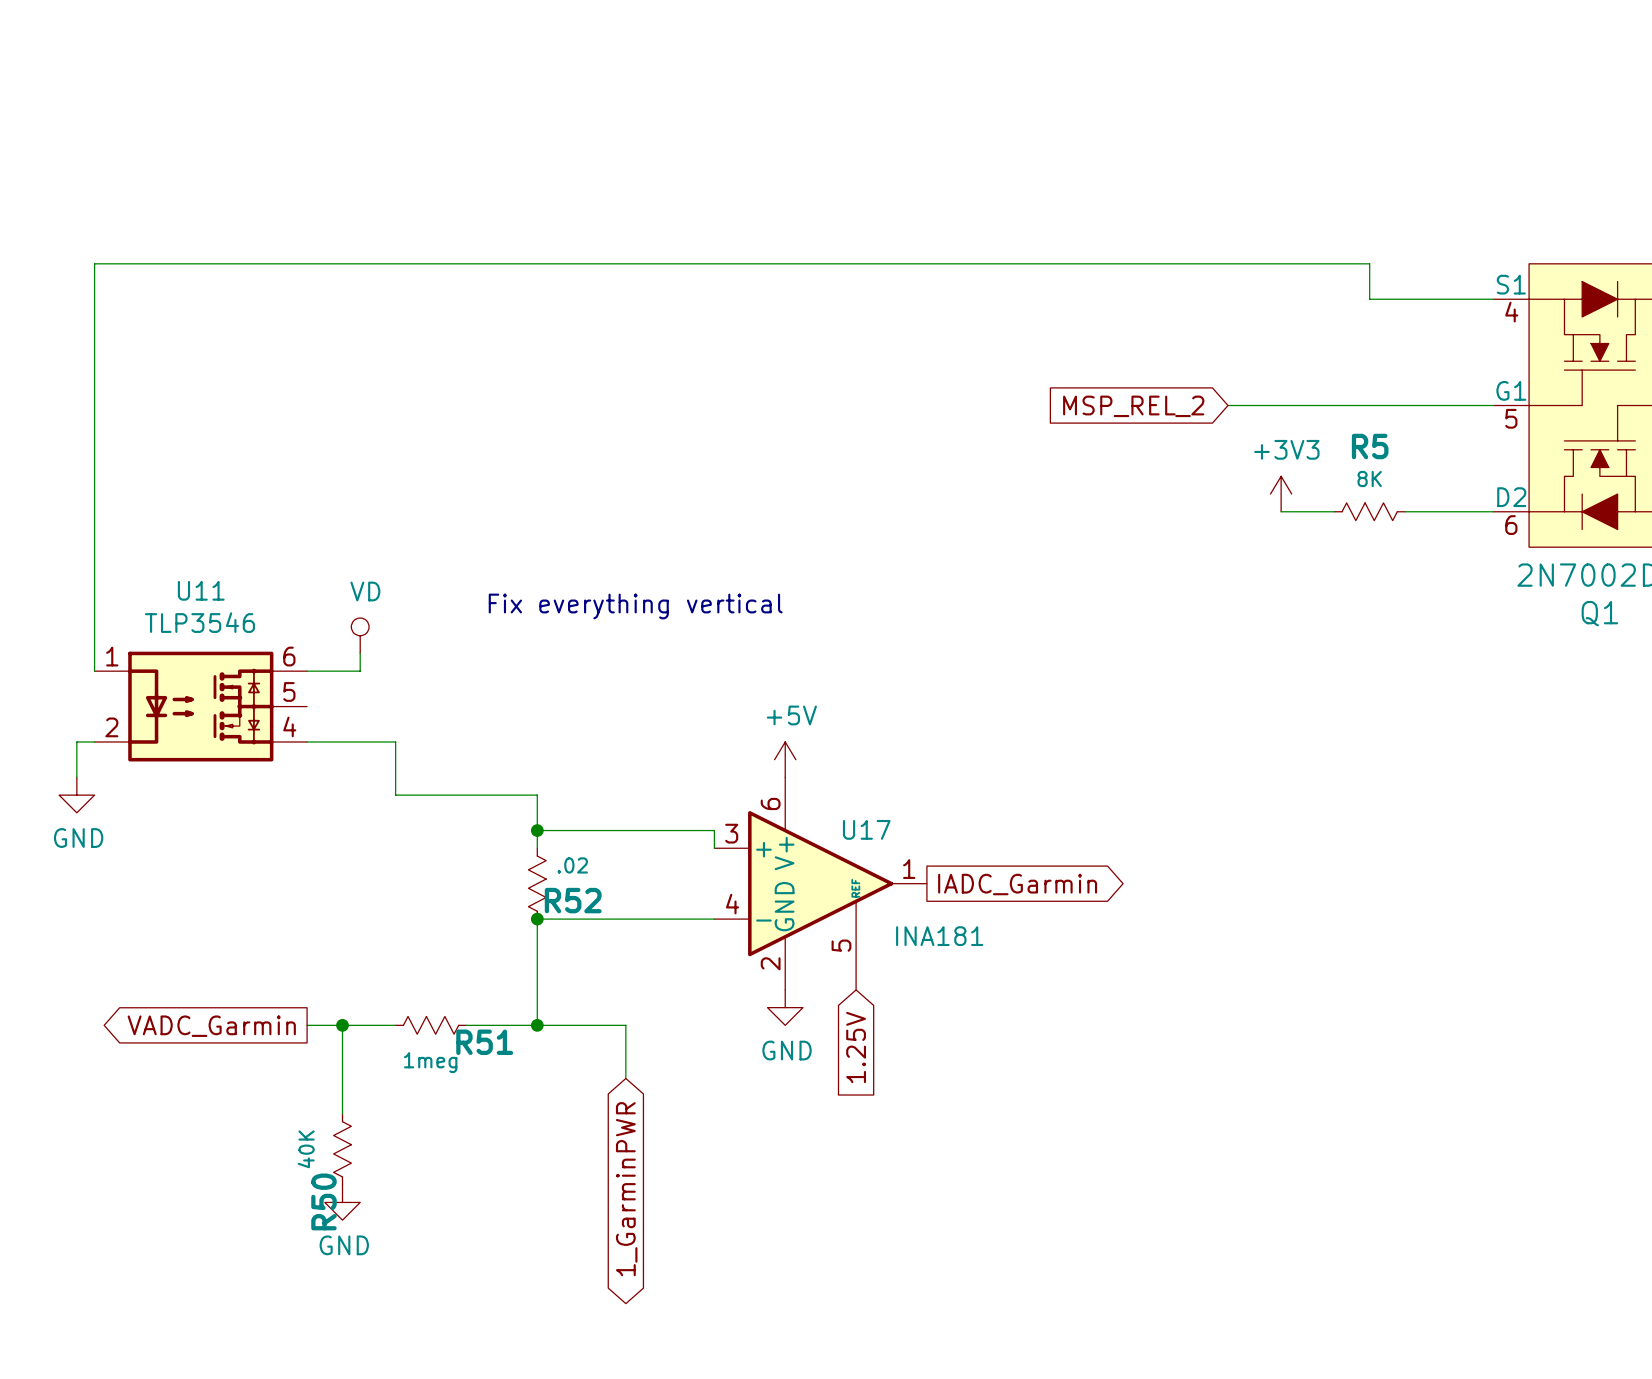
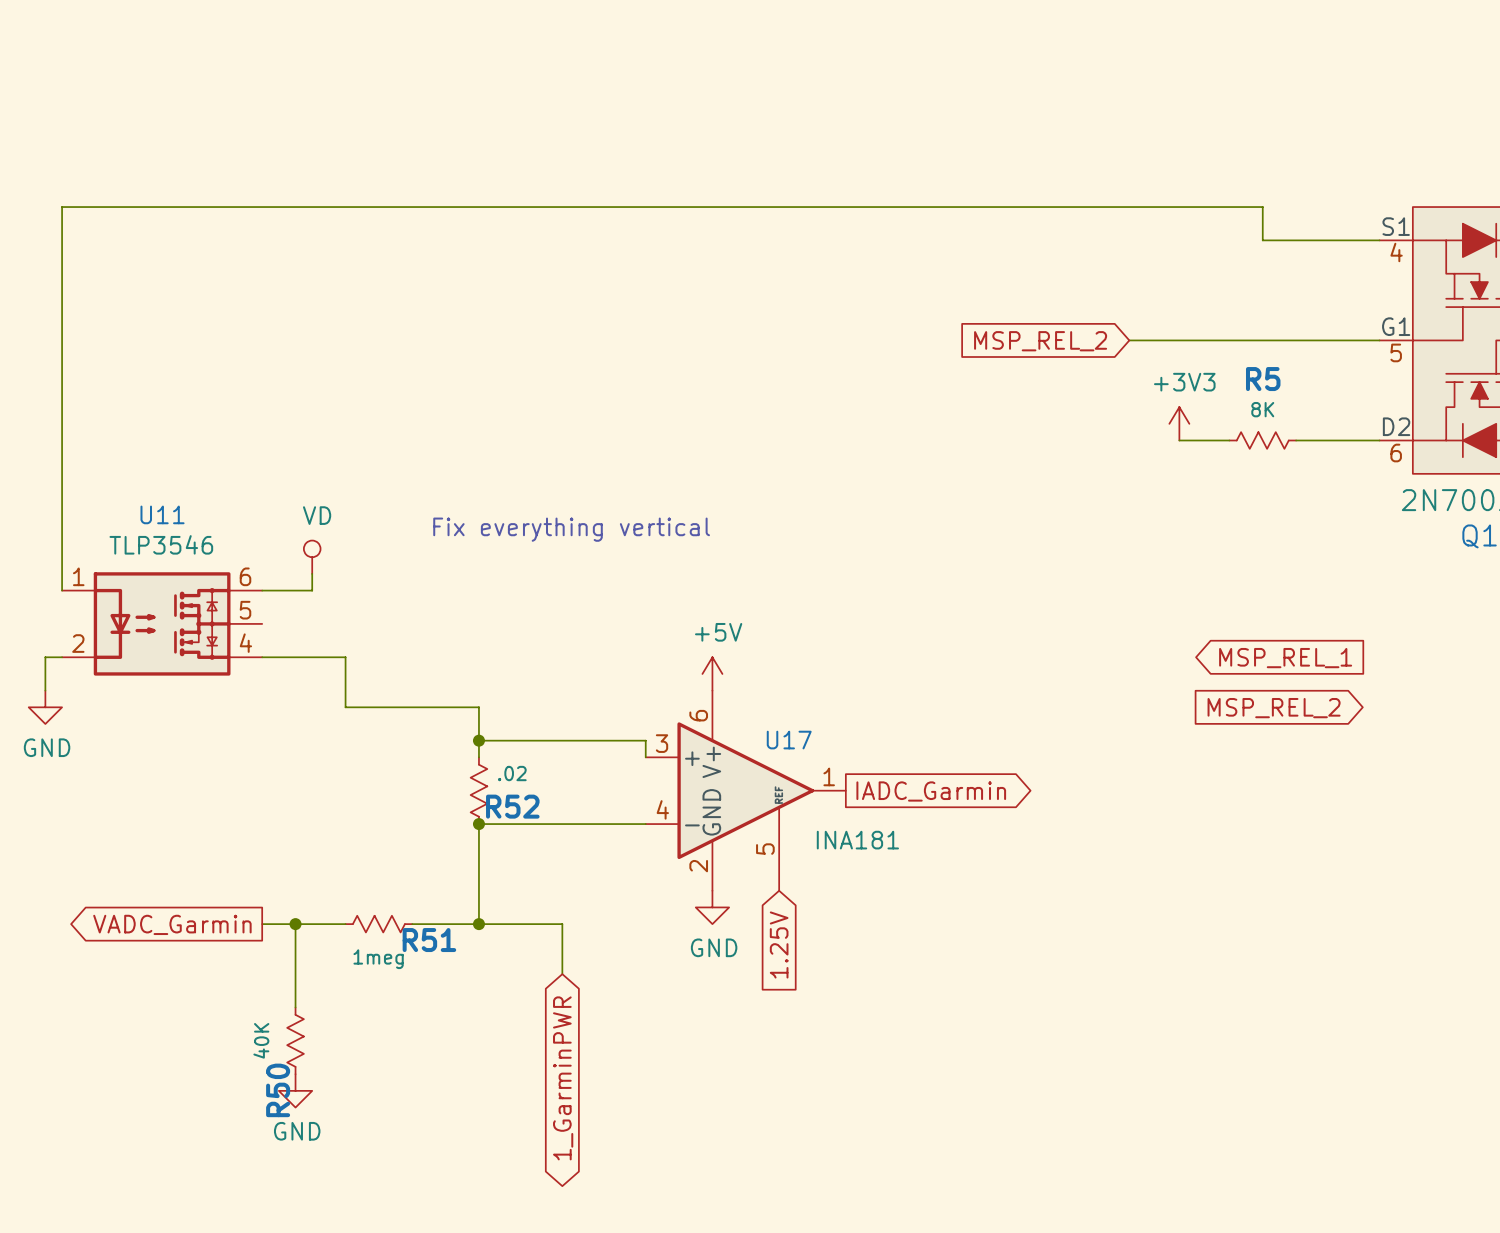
global label: none -> MSP_REL_1 (1285, 658)
global label: none -> MSP_REL_2 (1274, 708)

